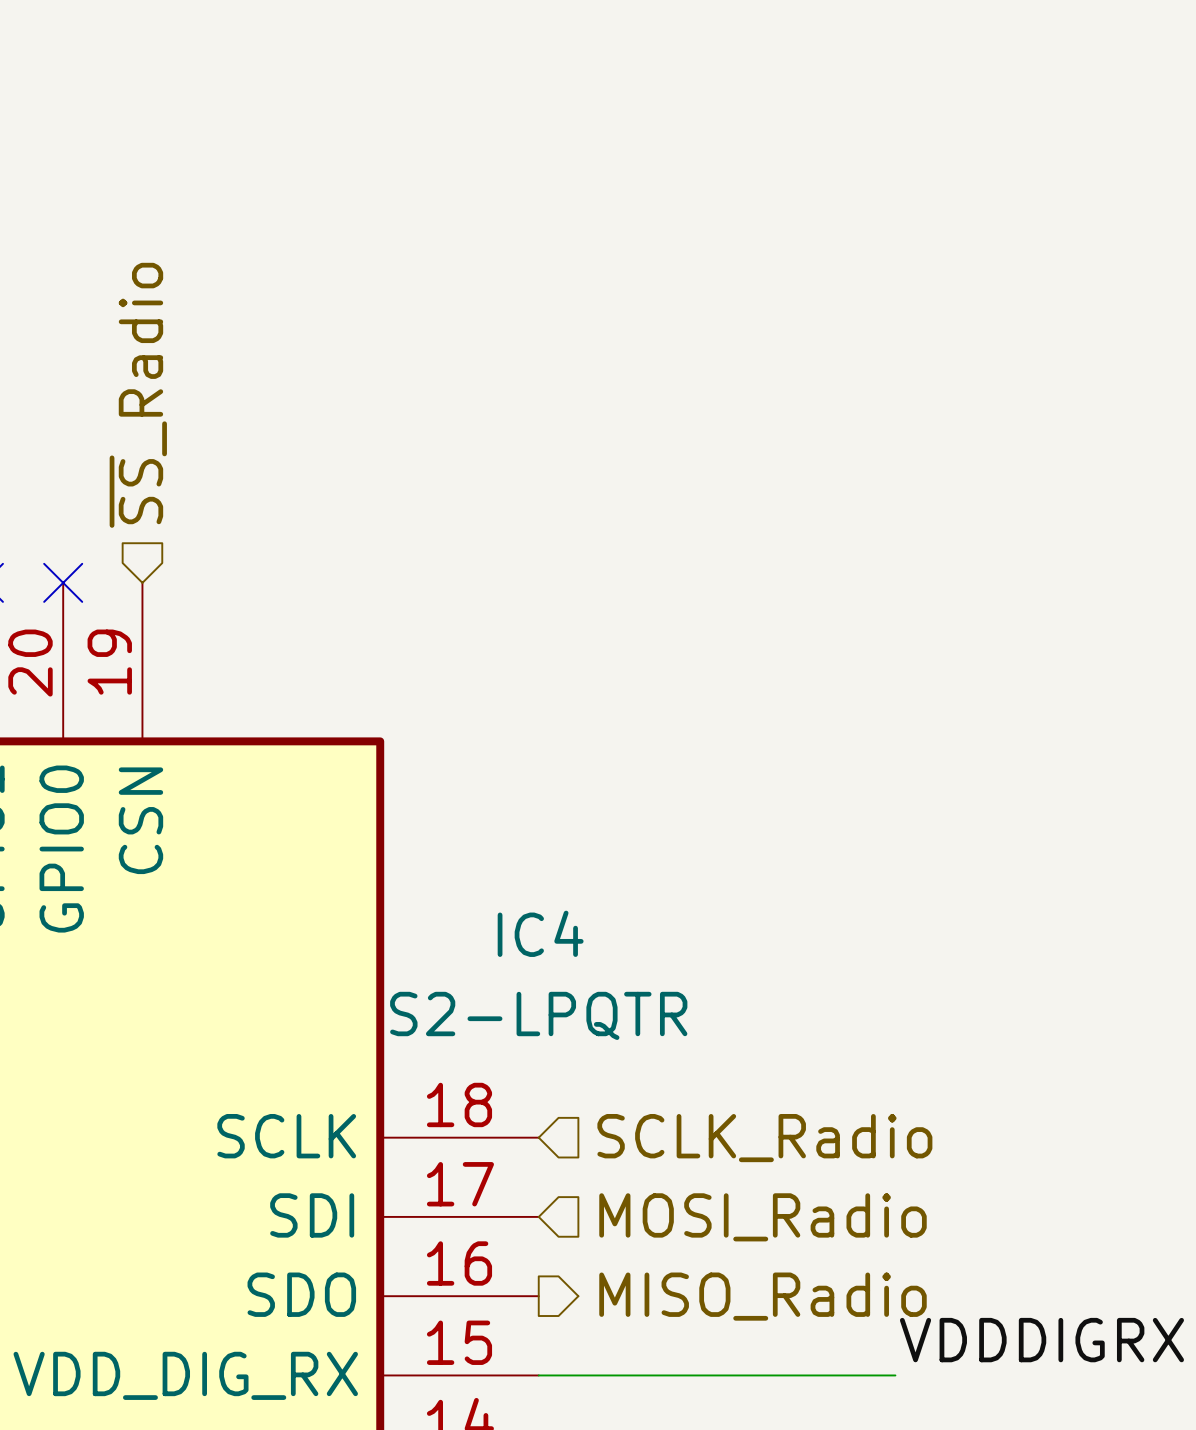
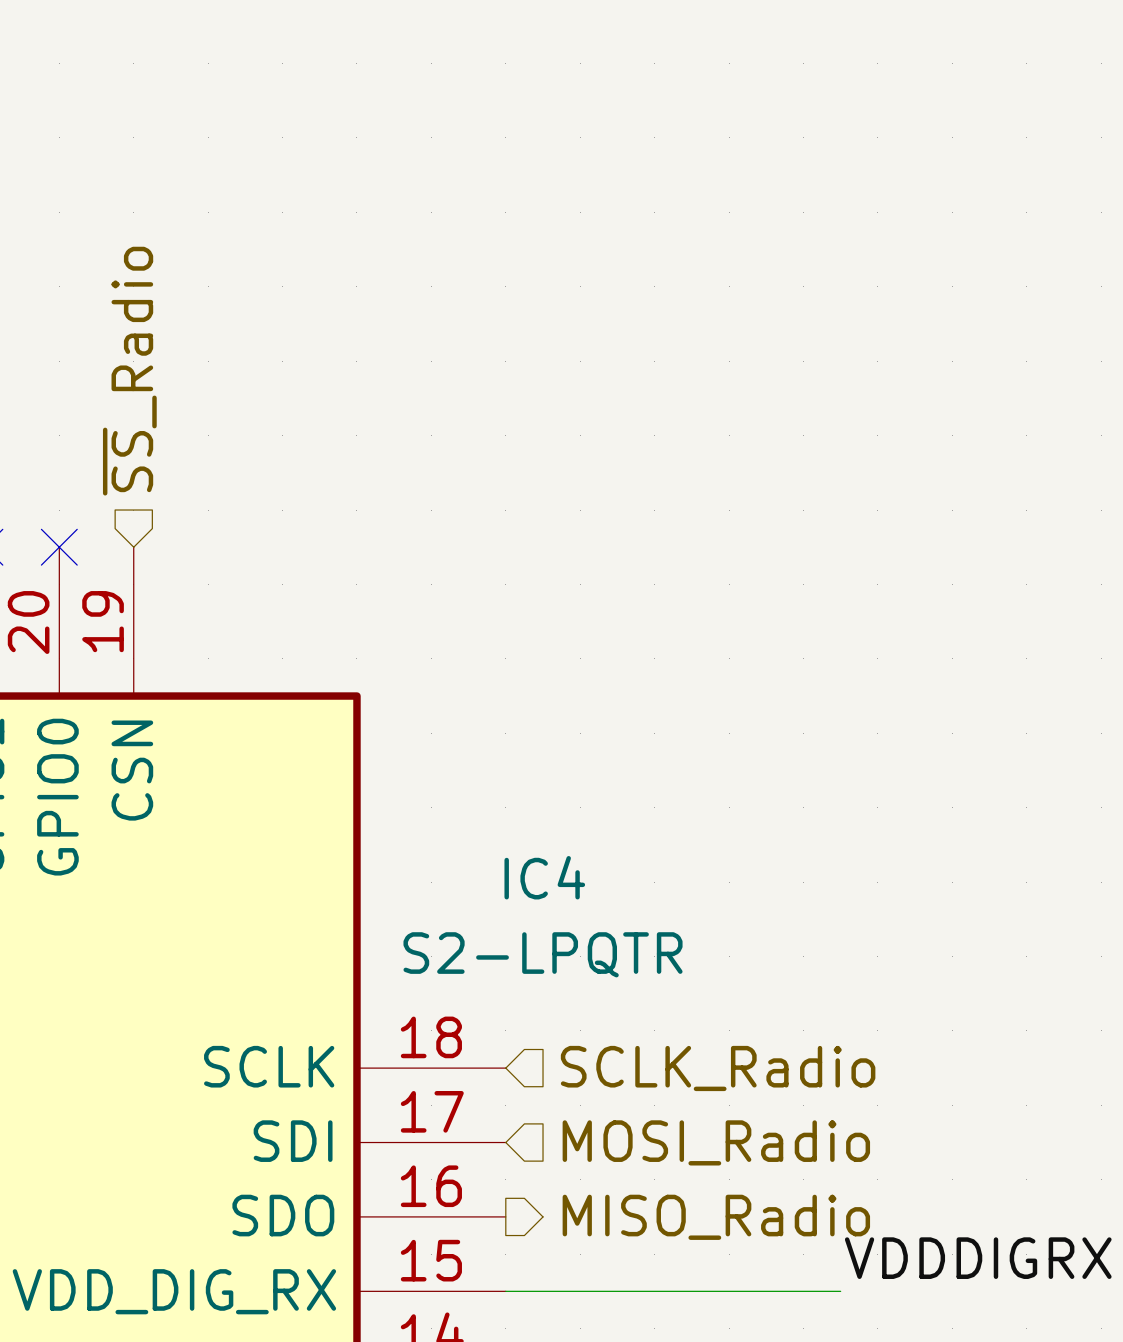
IC4 name position: IC4 (540, 933) -> IC4 (544, 877)
IC4 value position: S2-LPQTR (538, 1015) -> S2-LPQTR (543, 954)

